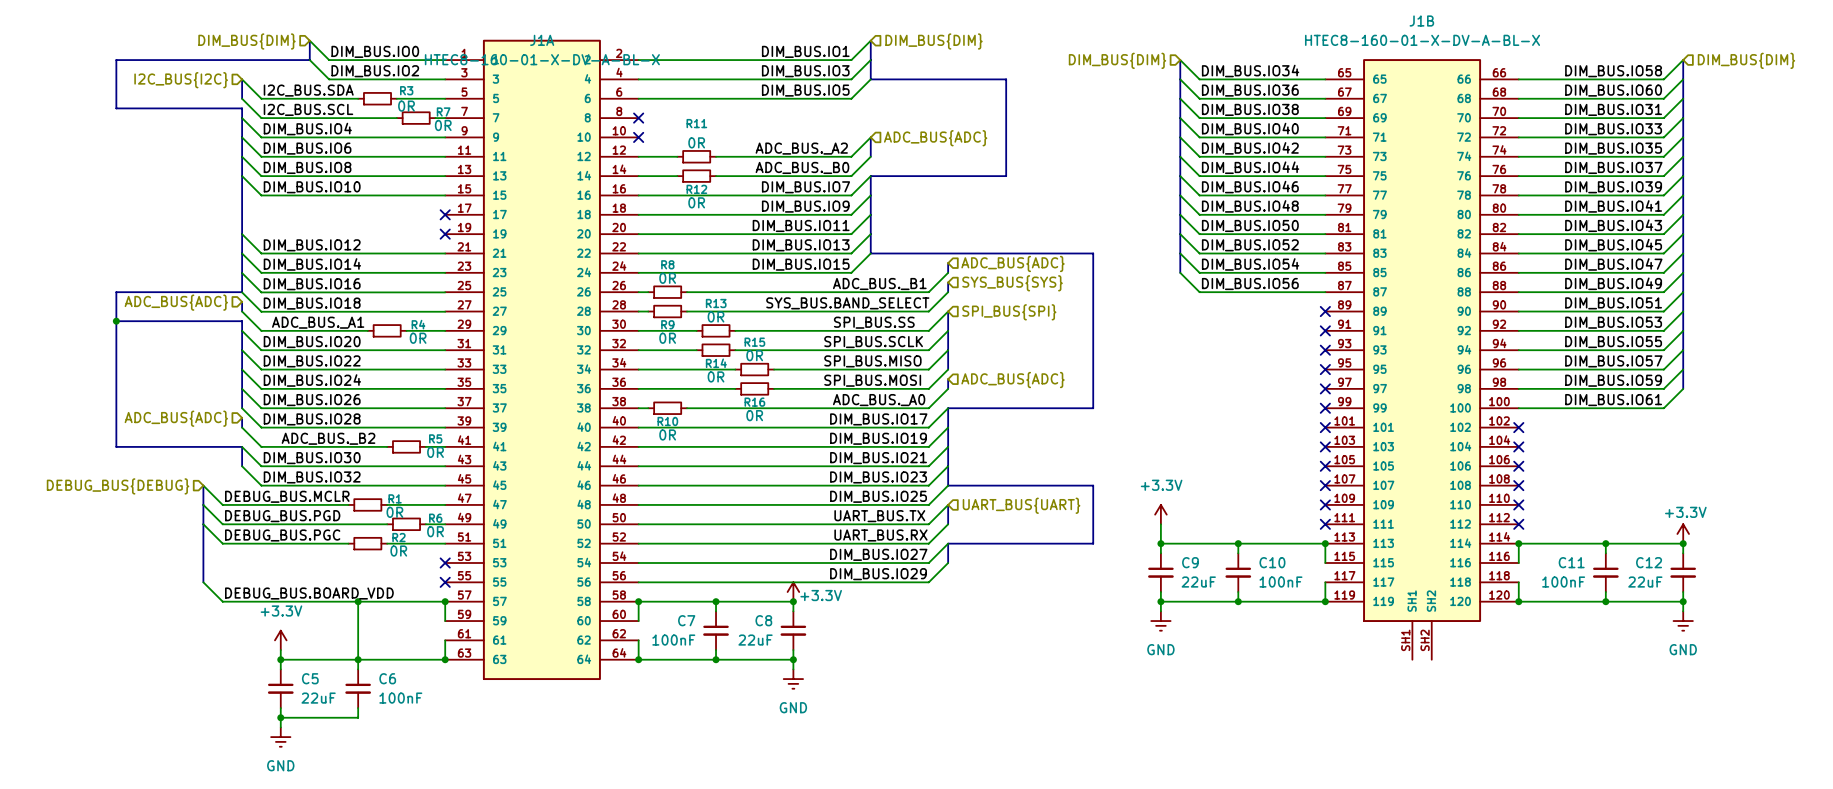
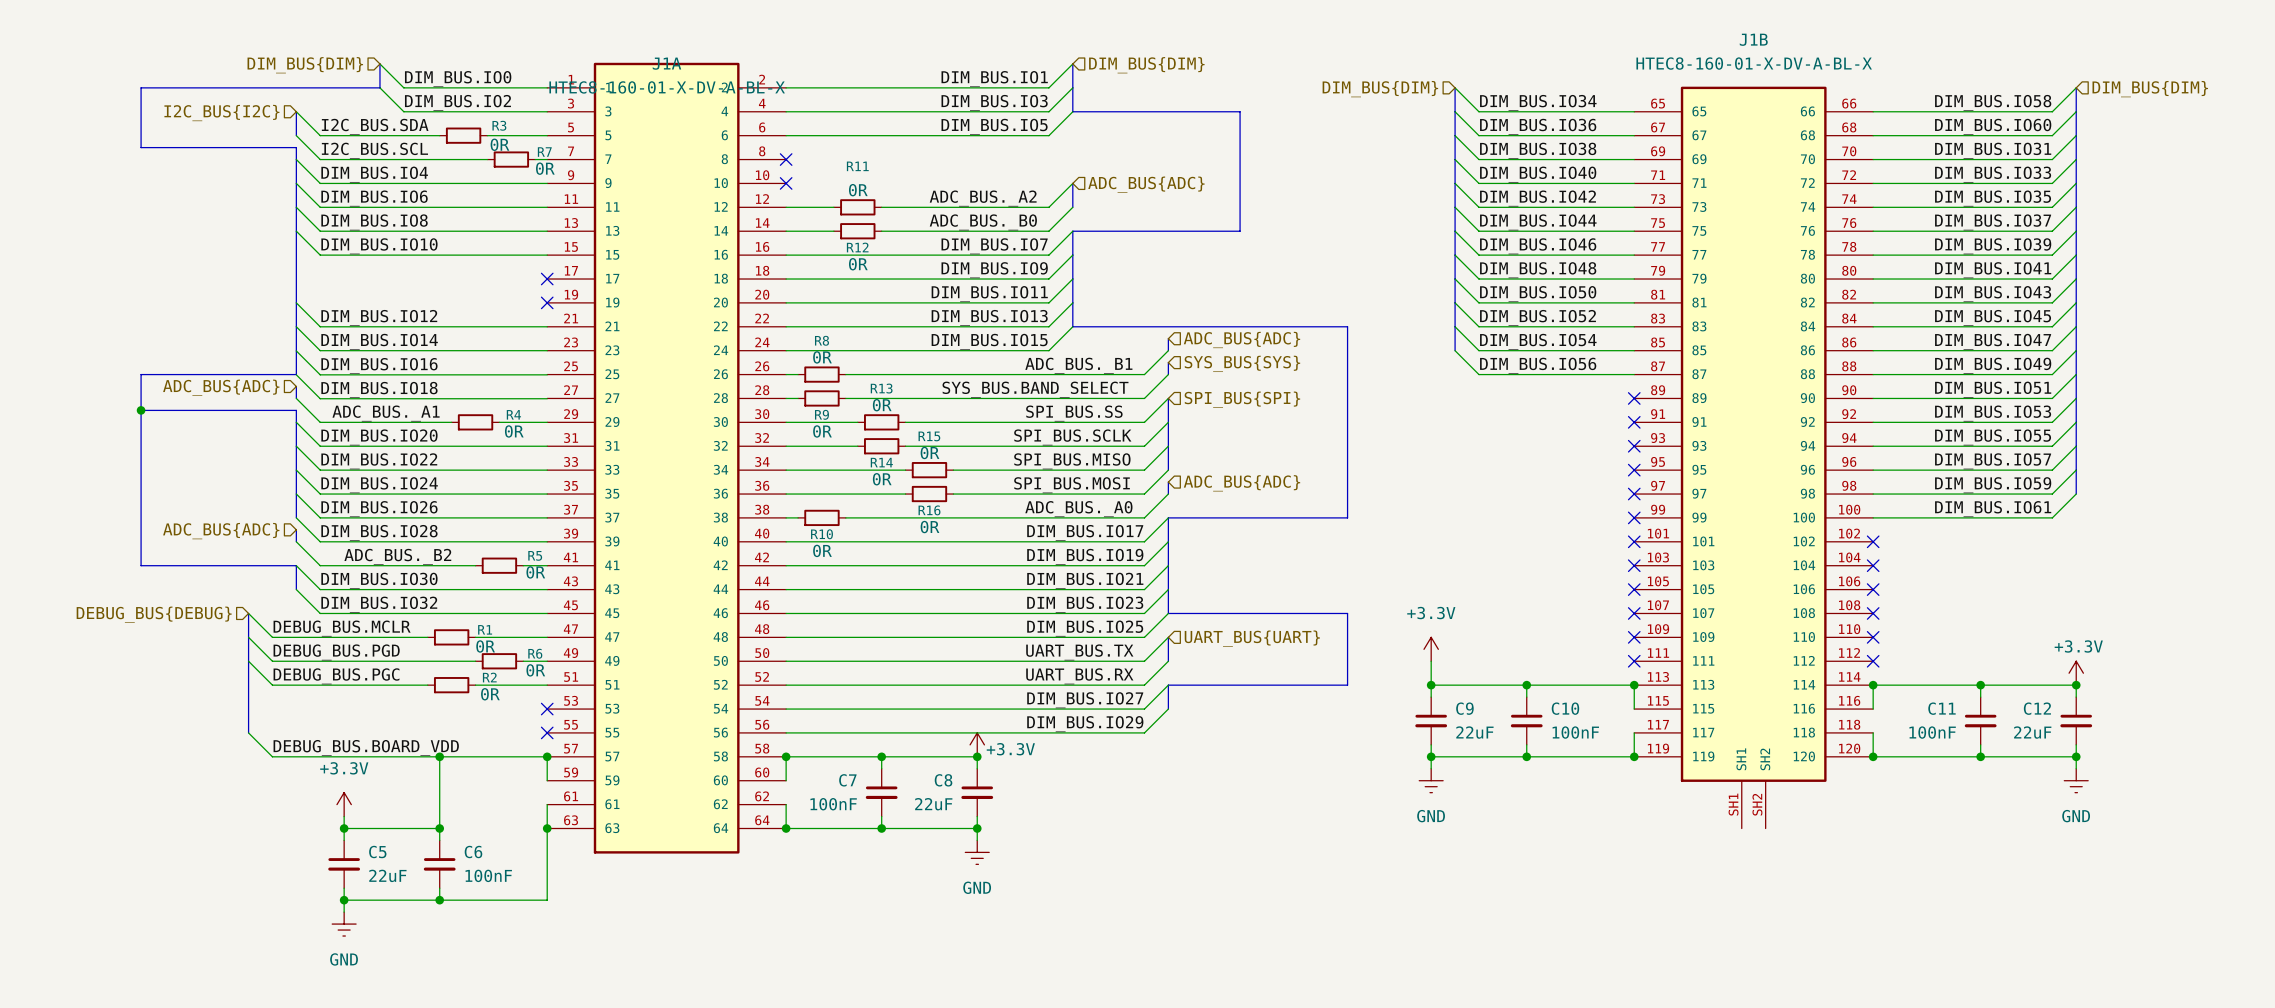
wire: (358, 659) (445, 659) -> (439, 900) (547, 900) (547, 828)
junction: none -> (439, 900)

